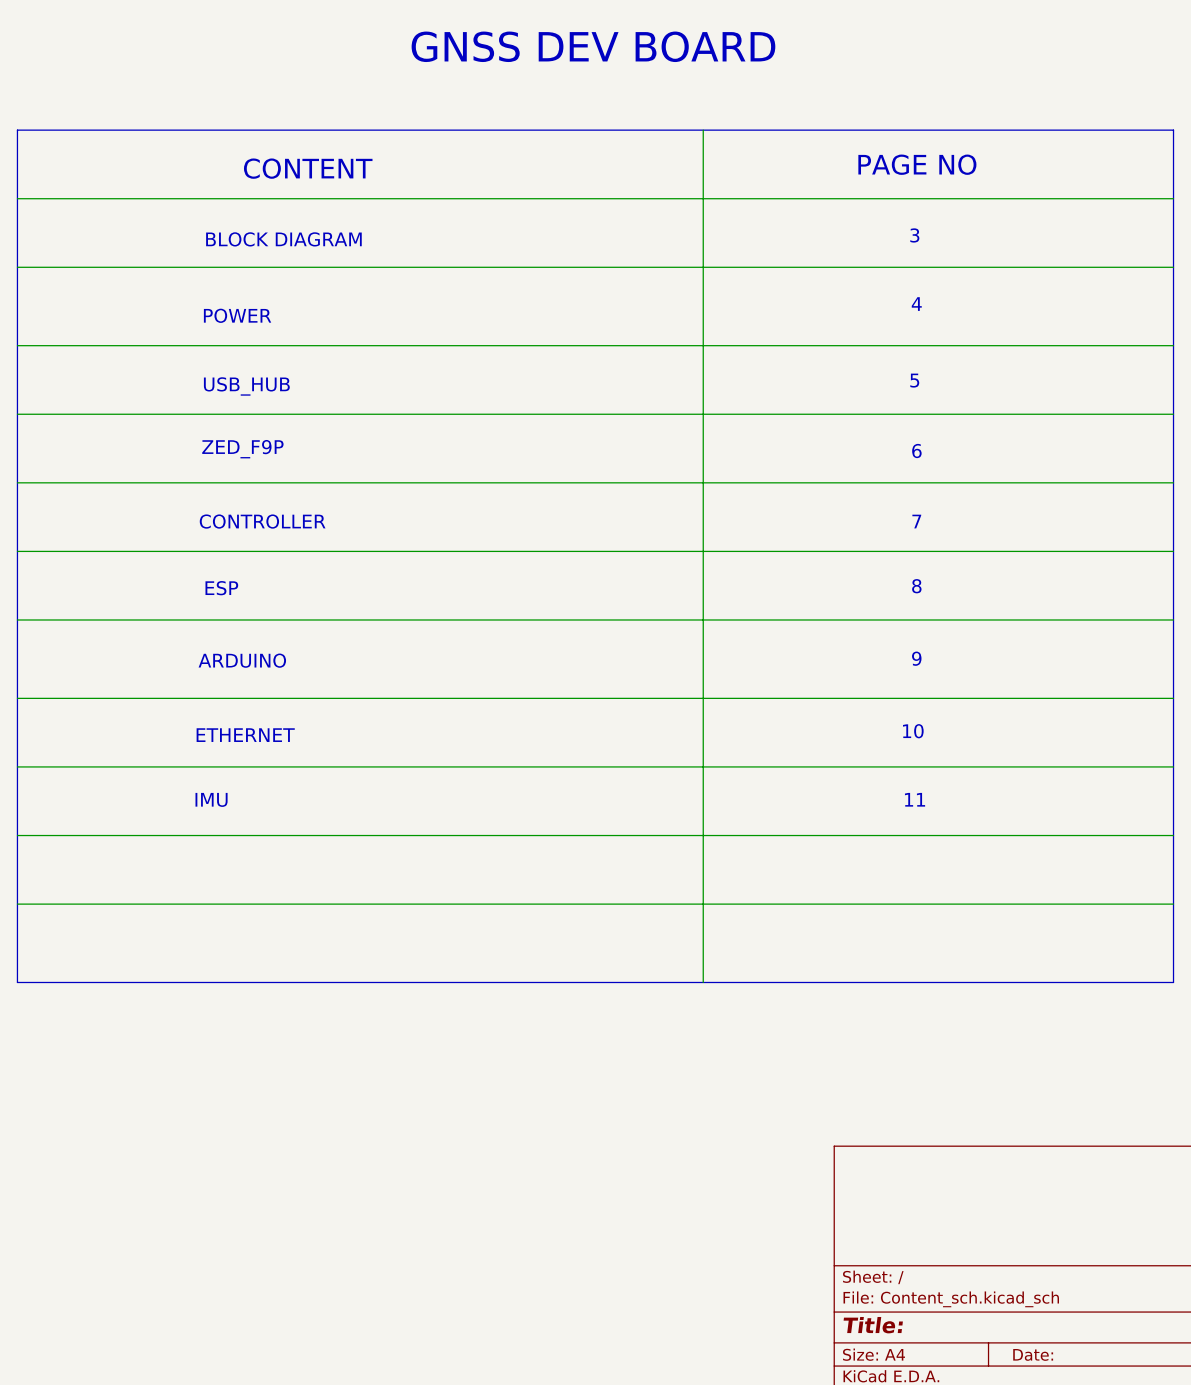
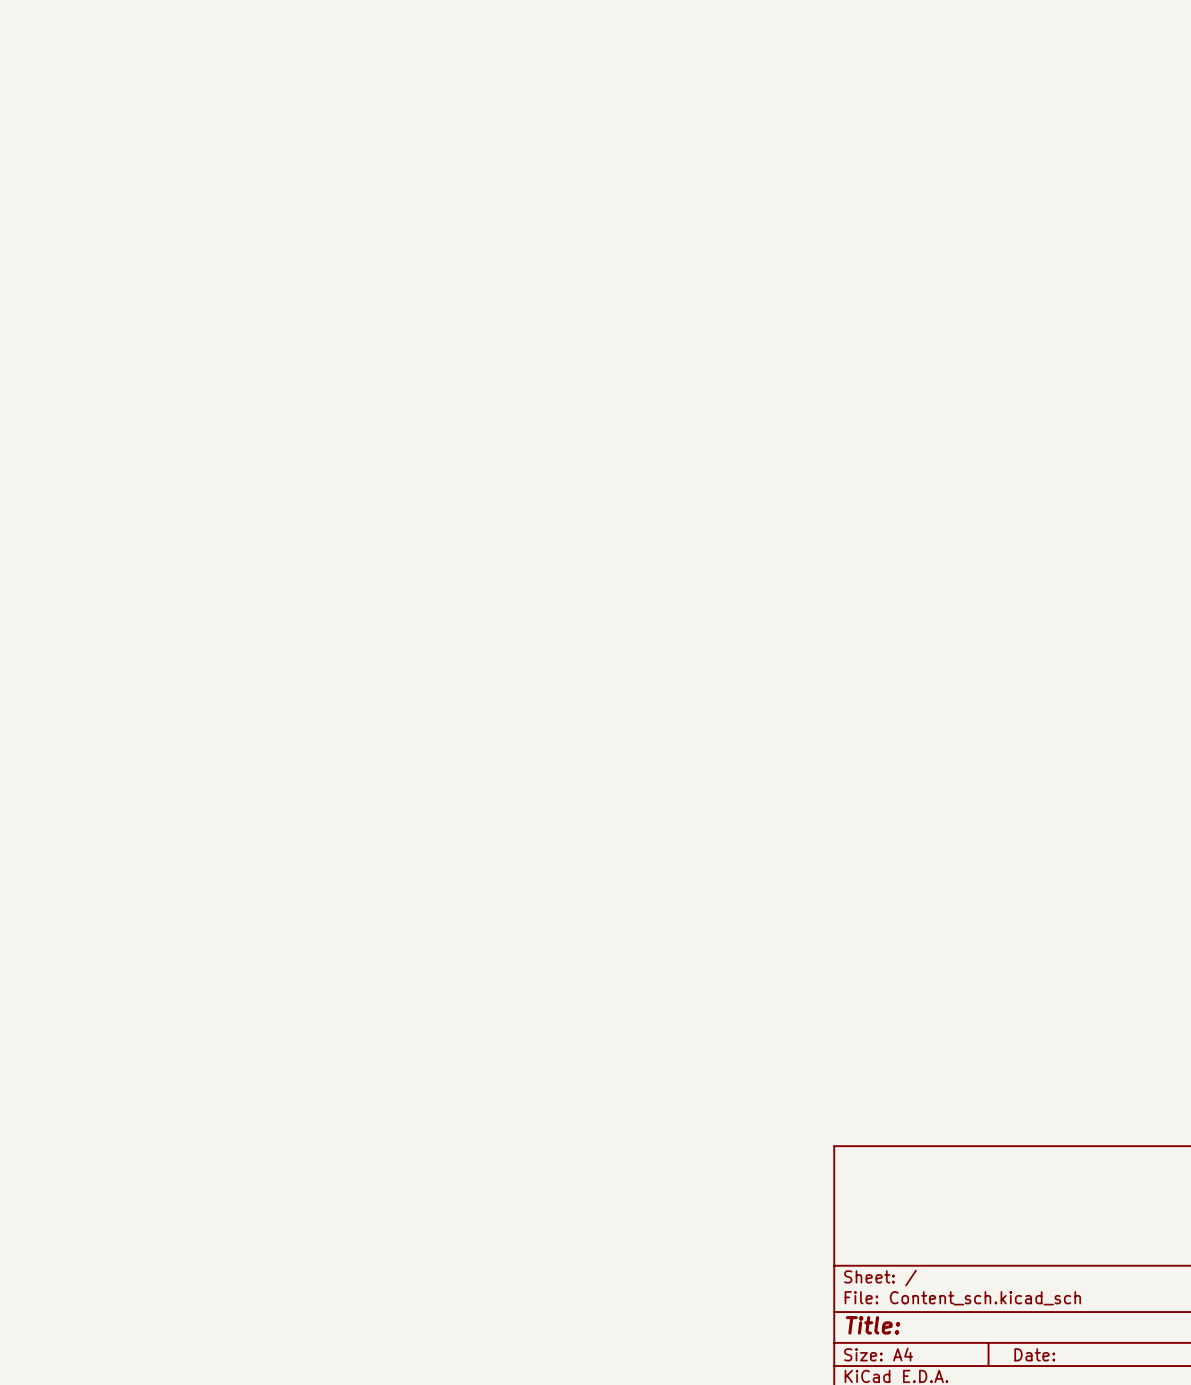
text: GNSS DEV BOARD (593, 46) -> none
line: (17, 130) (1173, 130) (1173, 982) (17, 982) (17, 130) -> none
wire: (703, 130) (703, 982) -> none
text: PAGE NO (917, 164) -> none
text: CONTENT (308, 168) -> none
wire: (17, 198) (1173, 198) -> none
text: 3 (914, 235) -> none
text: BLOCK DIAGRAM (283, 239) -> none
wire: (17, 267) (1173, 267) -> none
text: 4 (916, 304) -> none
text: POWER (237, 315) -> none
wire: (17, 345) (1173, 345) -> none
text: 5 (914, 380) -> none
text: USB_HUB (246, 386) -> none
wire: (17, 414) (1173, 414) -> none
text: ZED_F9P (242, 449) -> none
text: 6 (916, 451) -> none
wire: (17, 482) (1173, 482) -> none
text: CONTROLLER (262, 521) -> none
text: 7 (916, 521) -> none
wire: (17, 551) (1173, 551) -> none
text: 8 (916, 586) -> none
text: ESP (221, 588) -> none
wire: (17, 619) (1173, 619) -> none
text: 9 (916, 658) -> none
text: ARDUINO (242, 660) -> none
wire: (17, 698) (1173, 698) -> none
text: 10 (913, 731) -> none
text: ETHERNET (245, 735) -> none
wire: (17, 766) (1173, 766) -> none
text: IMU (211, 799) -> none
text: 11 (915, 799) -> none
wire: (17, 835) (1173, 835) -> none
wire: (17, 904) (1173, 904) -> none

